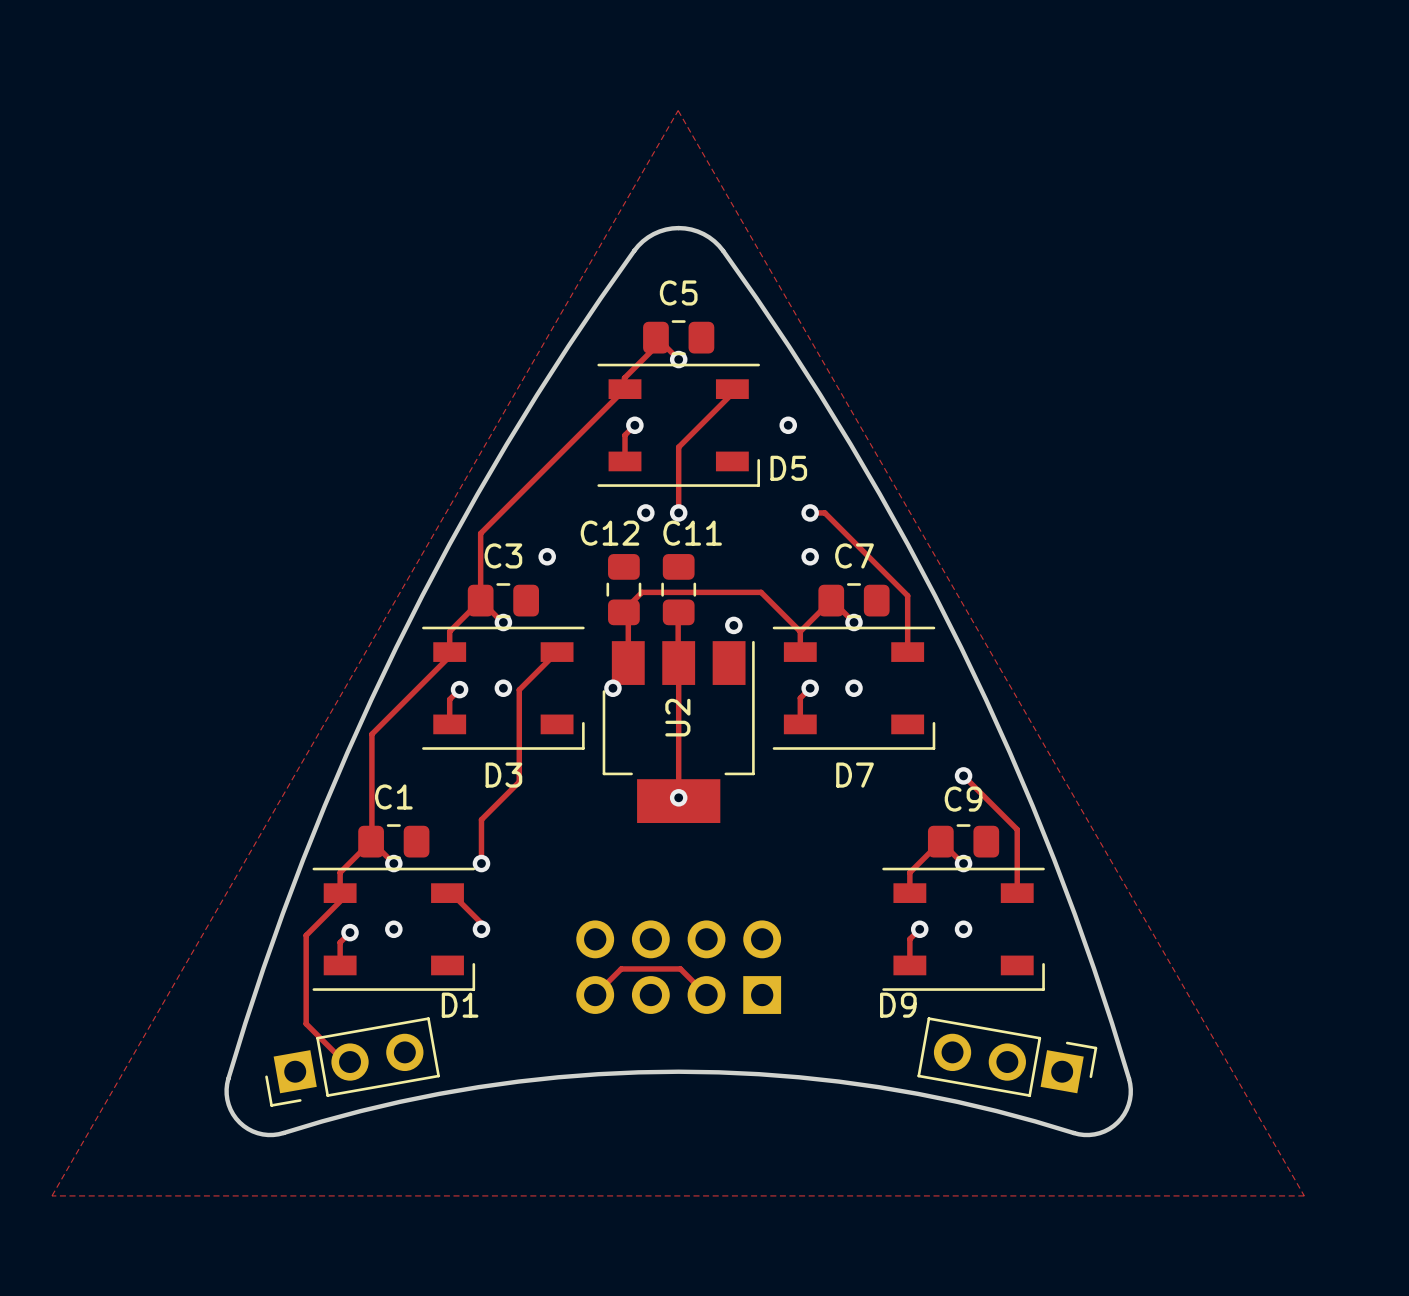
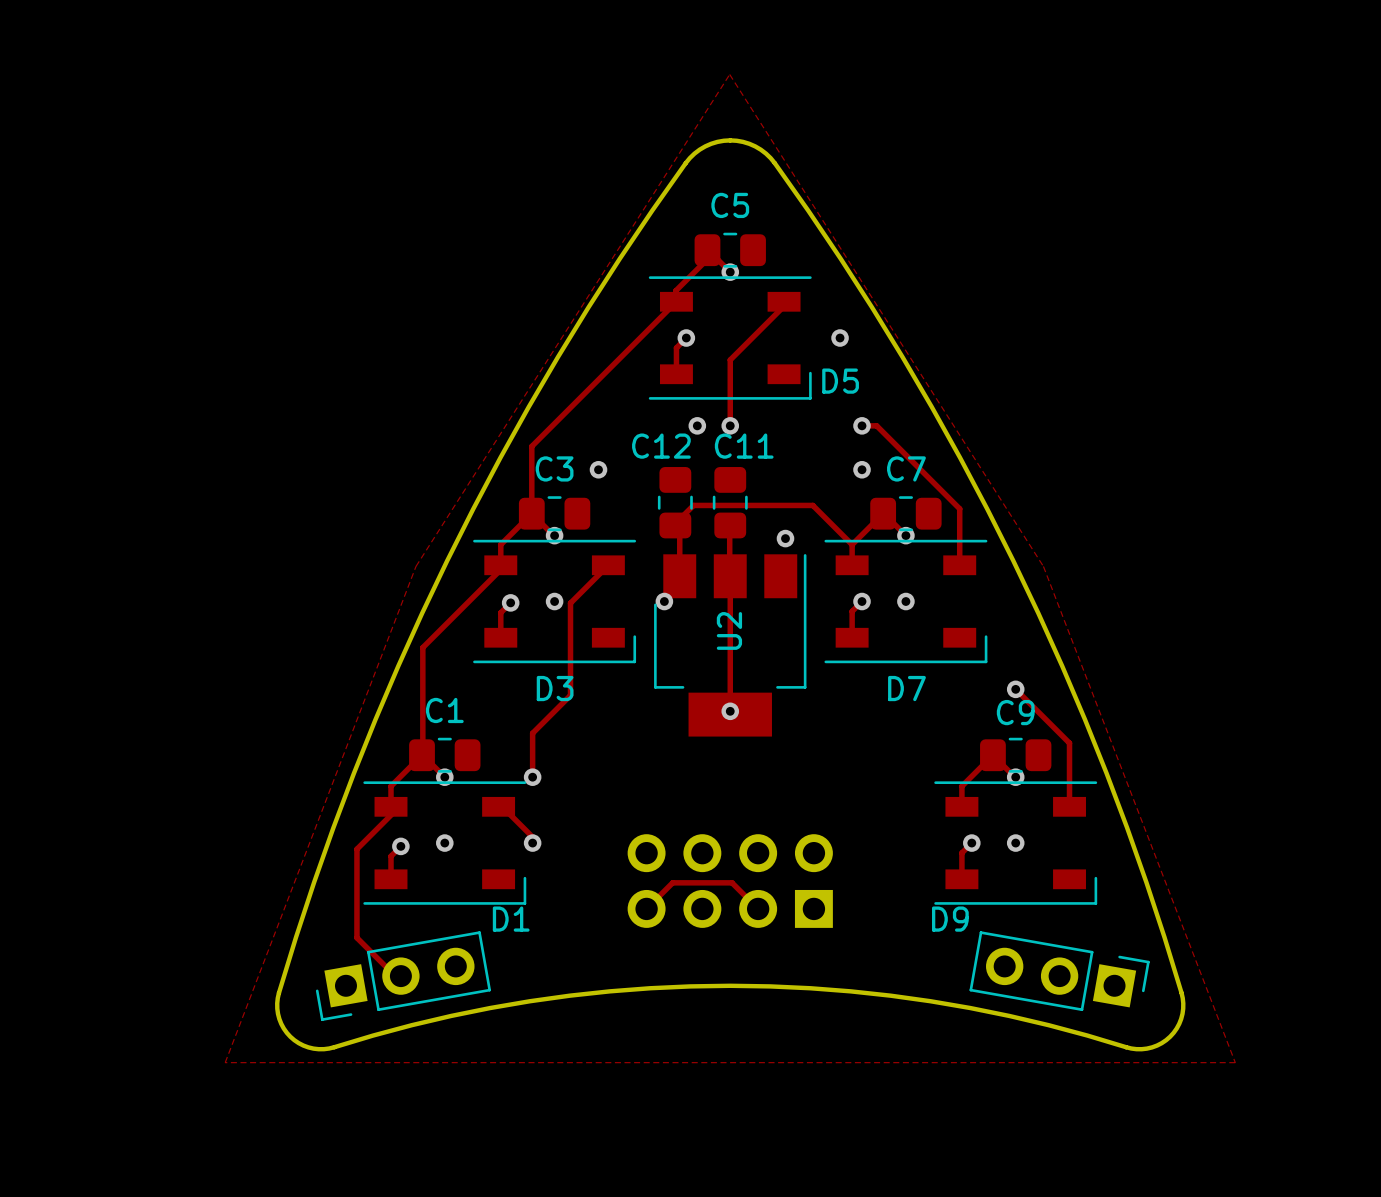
zone outline: (678, 110) (1304, 1195) (51, 1195) (678, 110) -> (729, 74) (415, 566) (225, 1062) (1235, 1062) (1043, 566) (729, 74)

